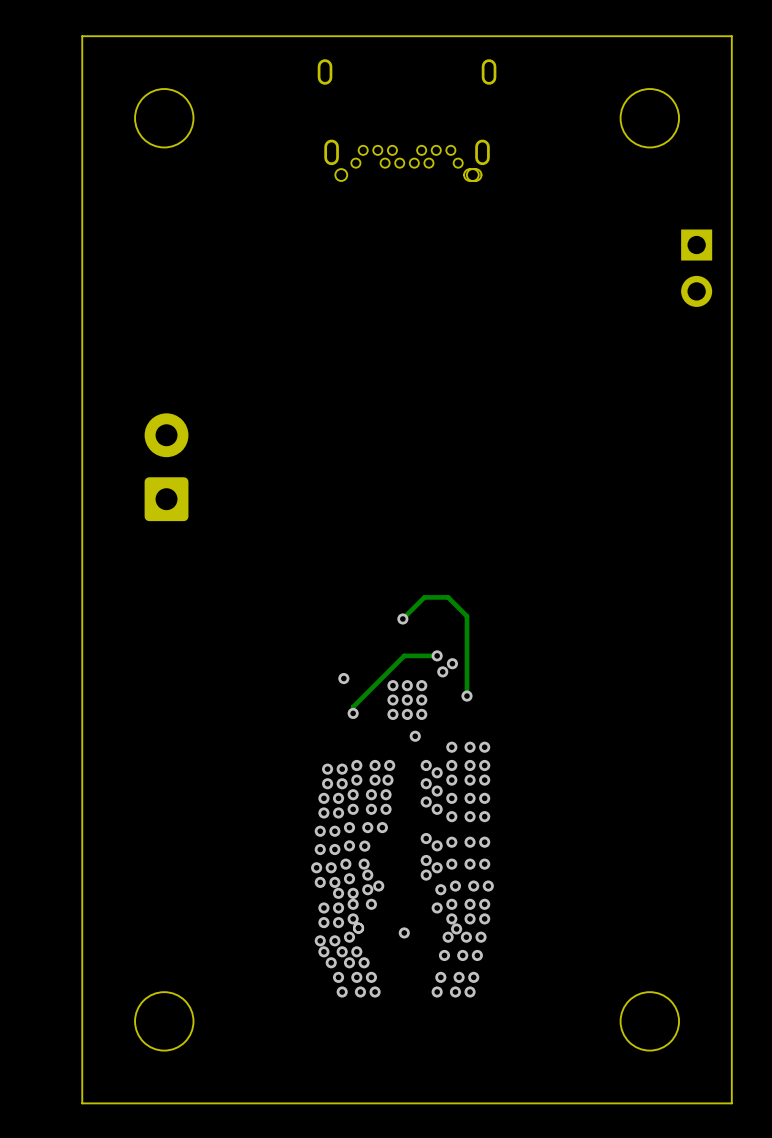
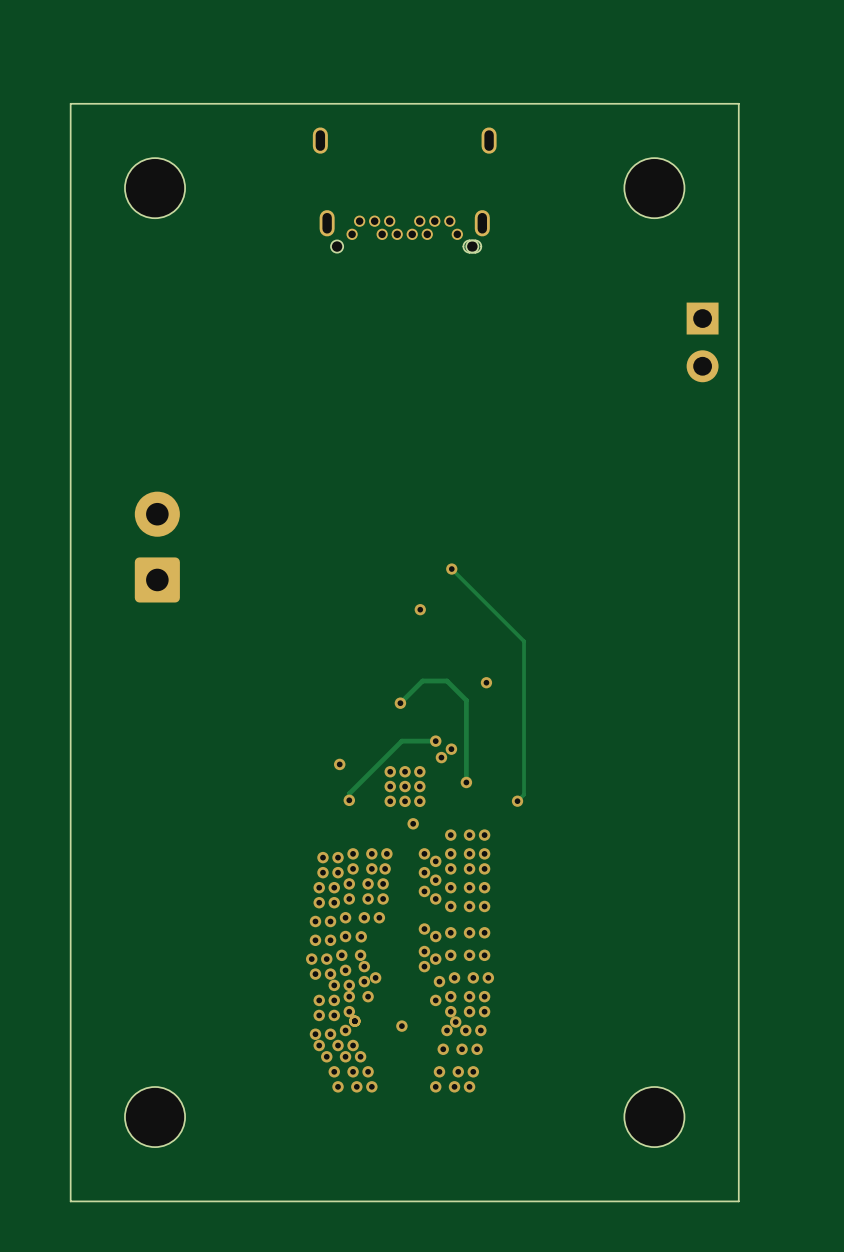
track: none -> (451, 569) (524, 641) (524, 794) (517, 801)
via: none -> (451, 569)
via: none -> (420, 609)
via: none -> (486, 682)
via: none -> (517, 801)

